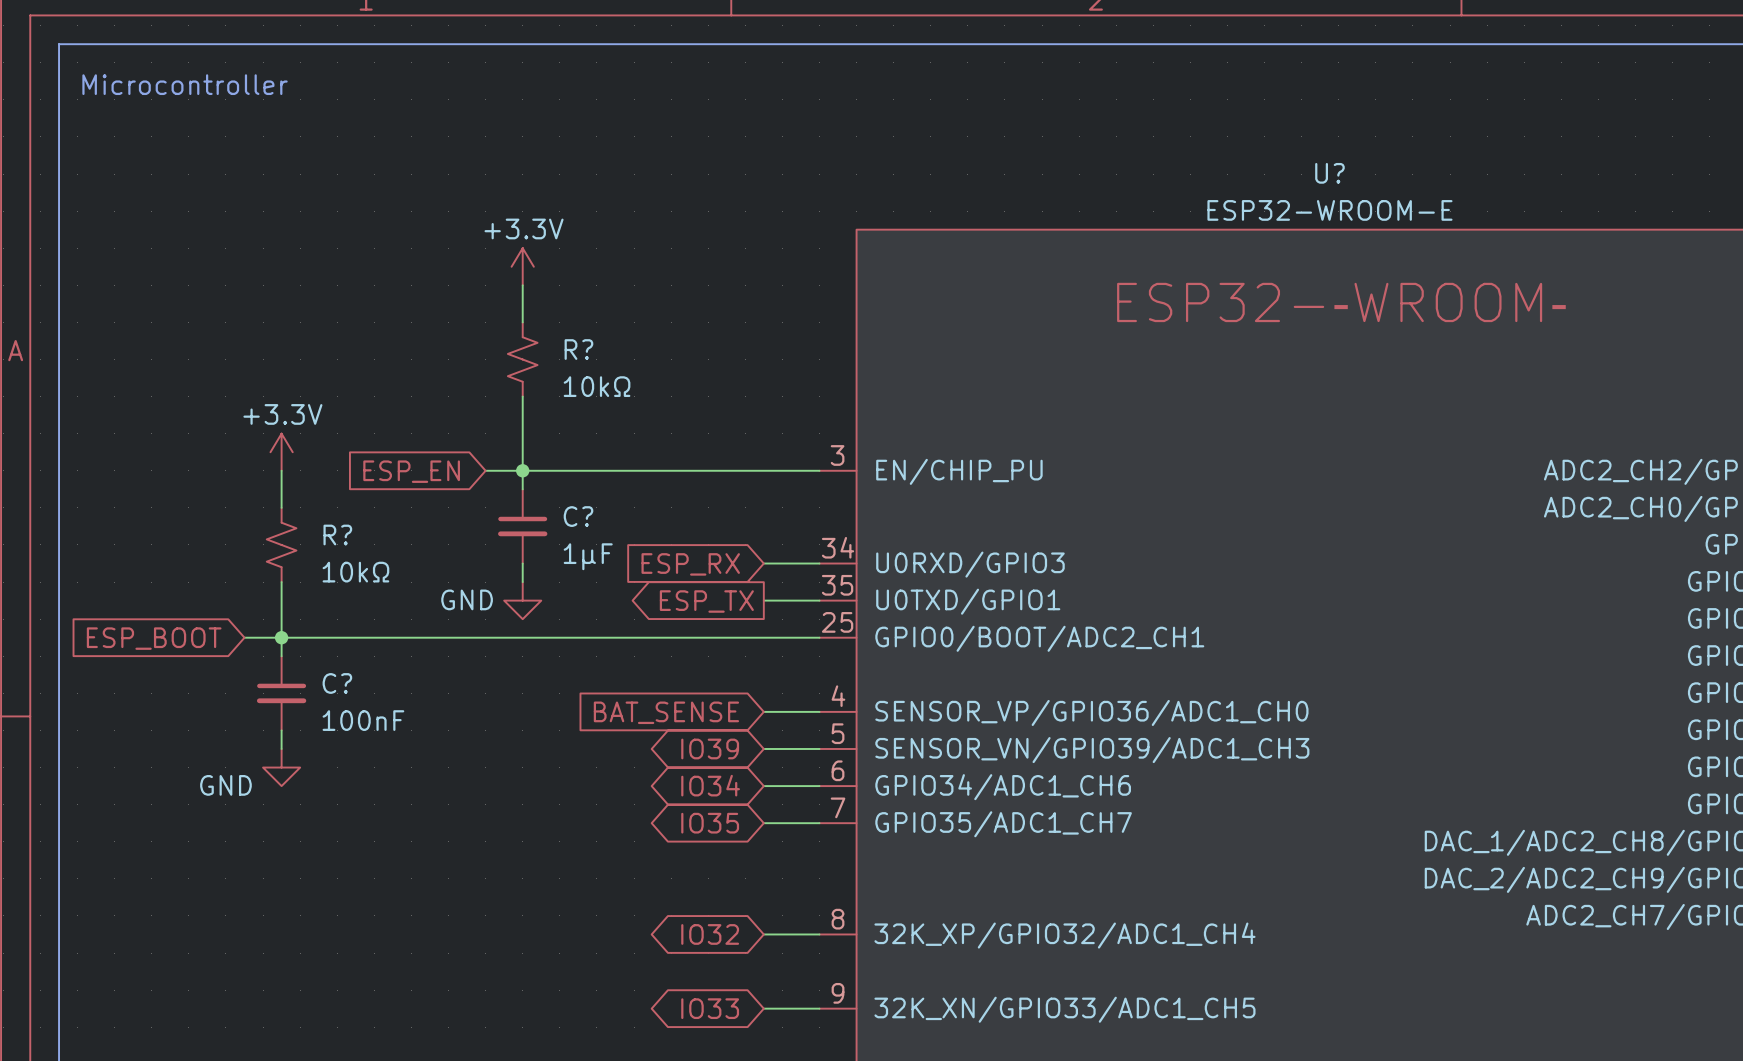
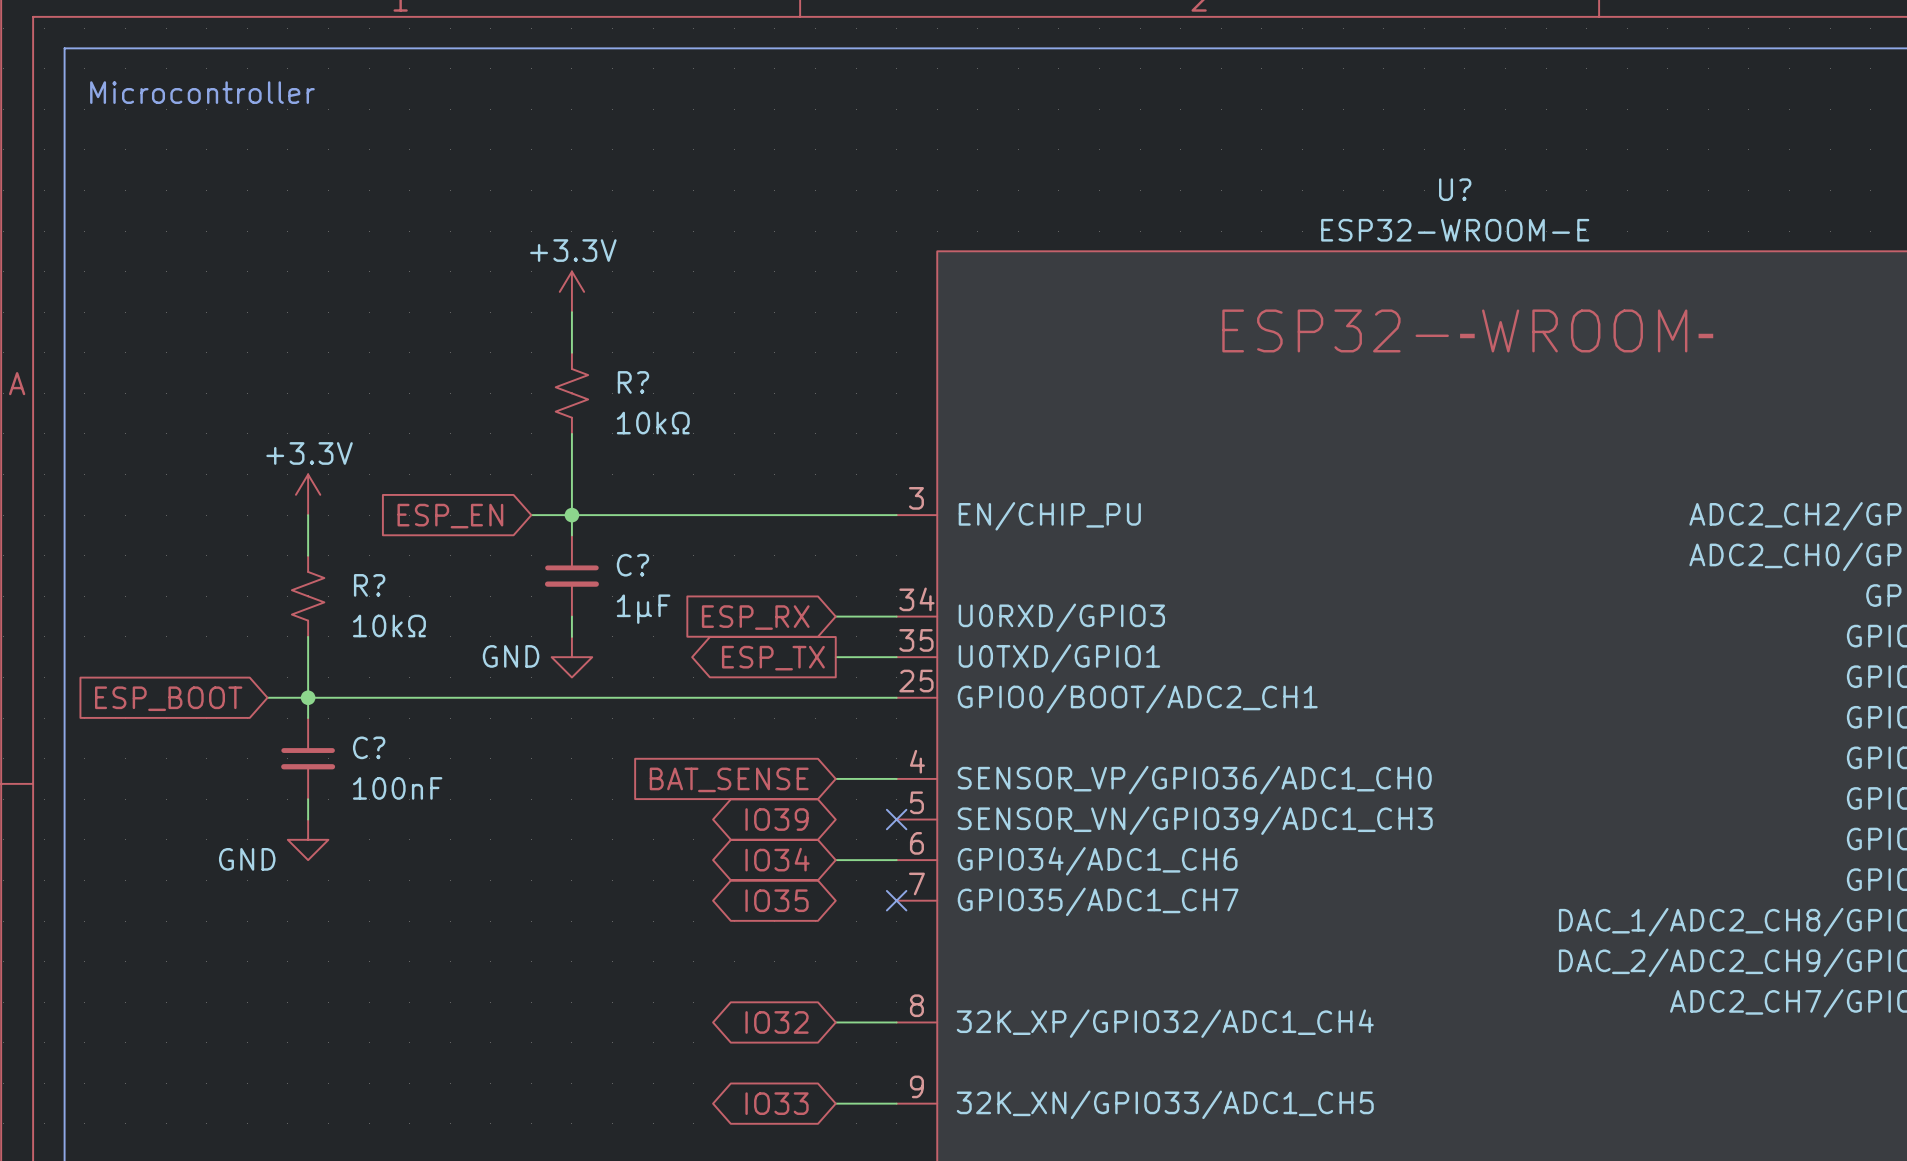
wire: (763, 748) (819, 748) -> none
no-connect mark: none -> (896, 819)
wire: (763, 823) (819, 823) -> none
no-connect mark: none -> (896, 900)

